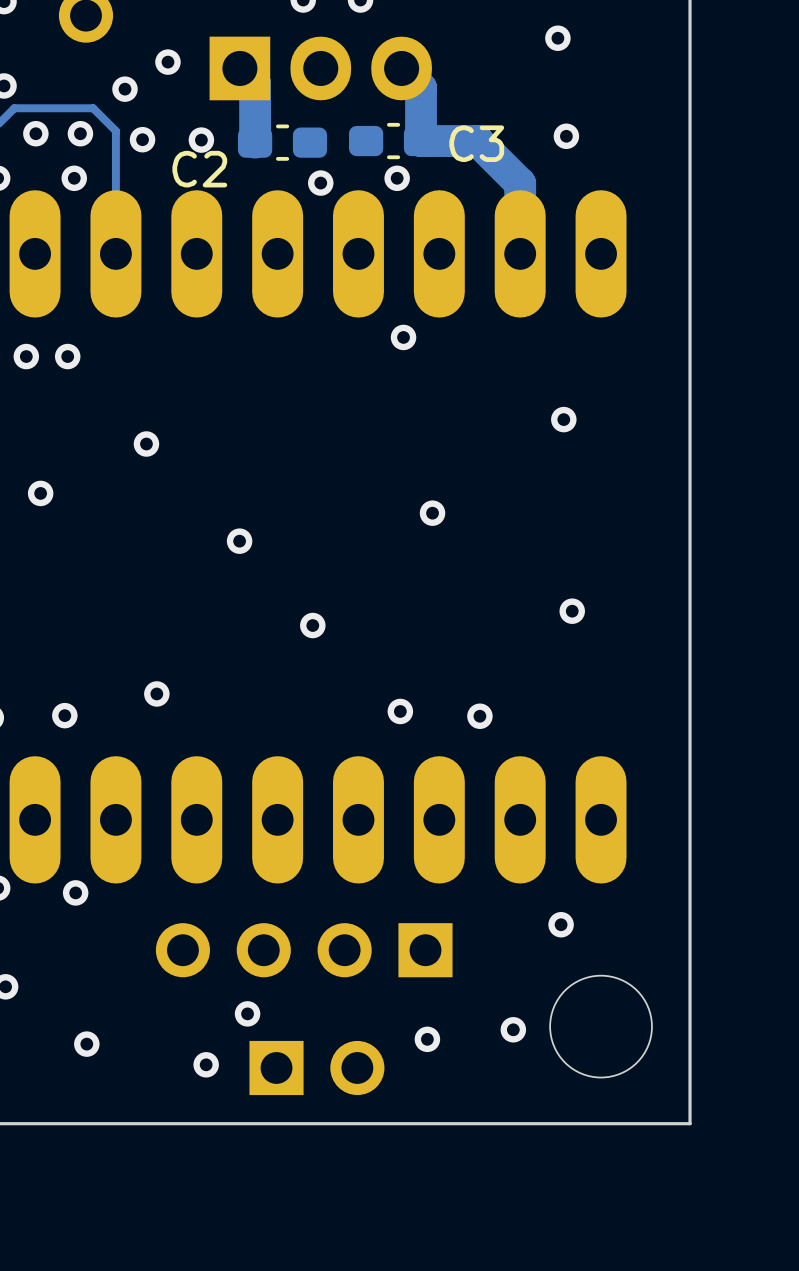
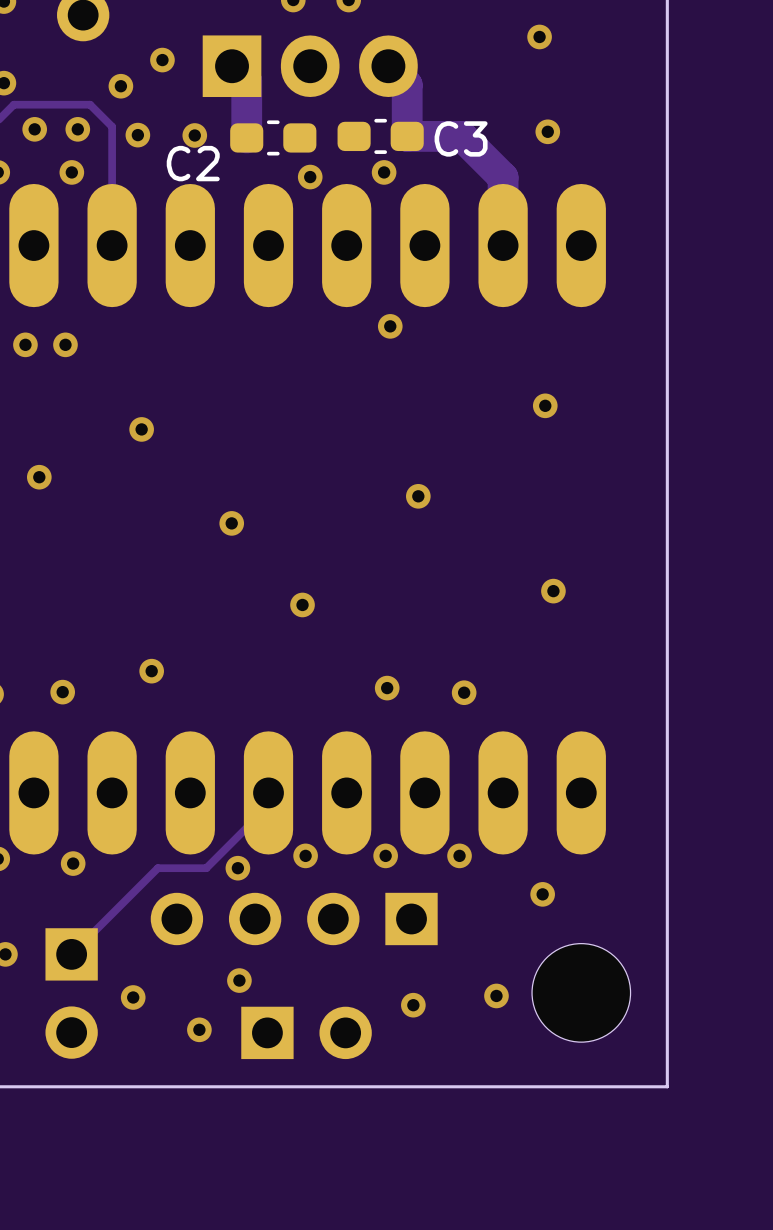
track: none -> (268, 792) (268, 806) (206, 868) (157, 868) (71, 954)
via: none -> (305, 855)
via: none -> (385, 855)
via: none -> (459, 855)
via: none -> (237, 868)
part: none -> (71, 993)
via position: (86, 1044) -> (133, 997)

